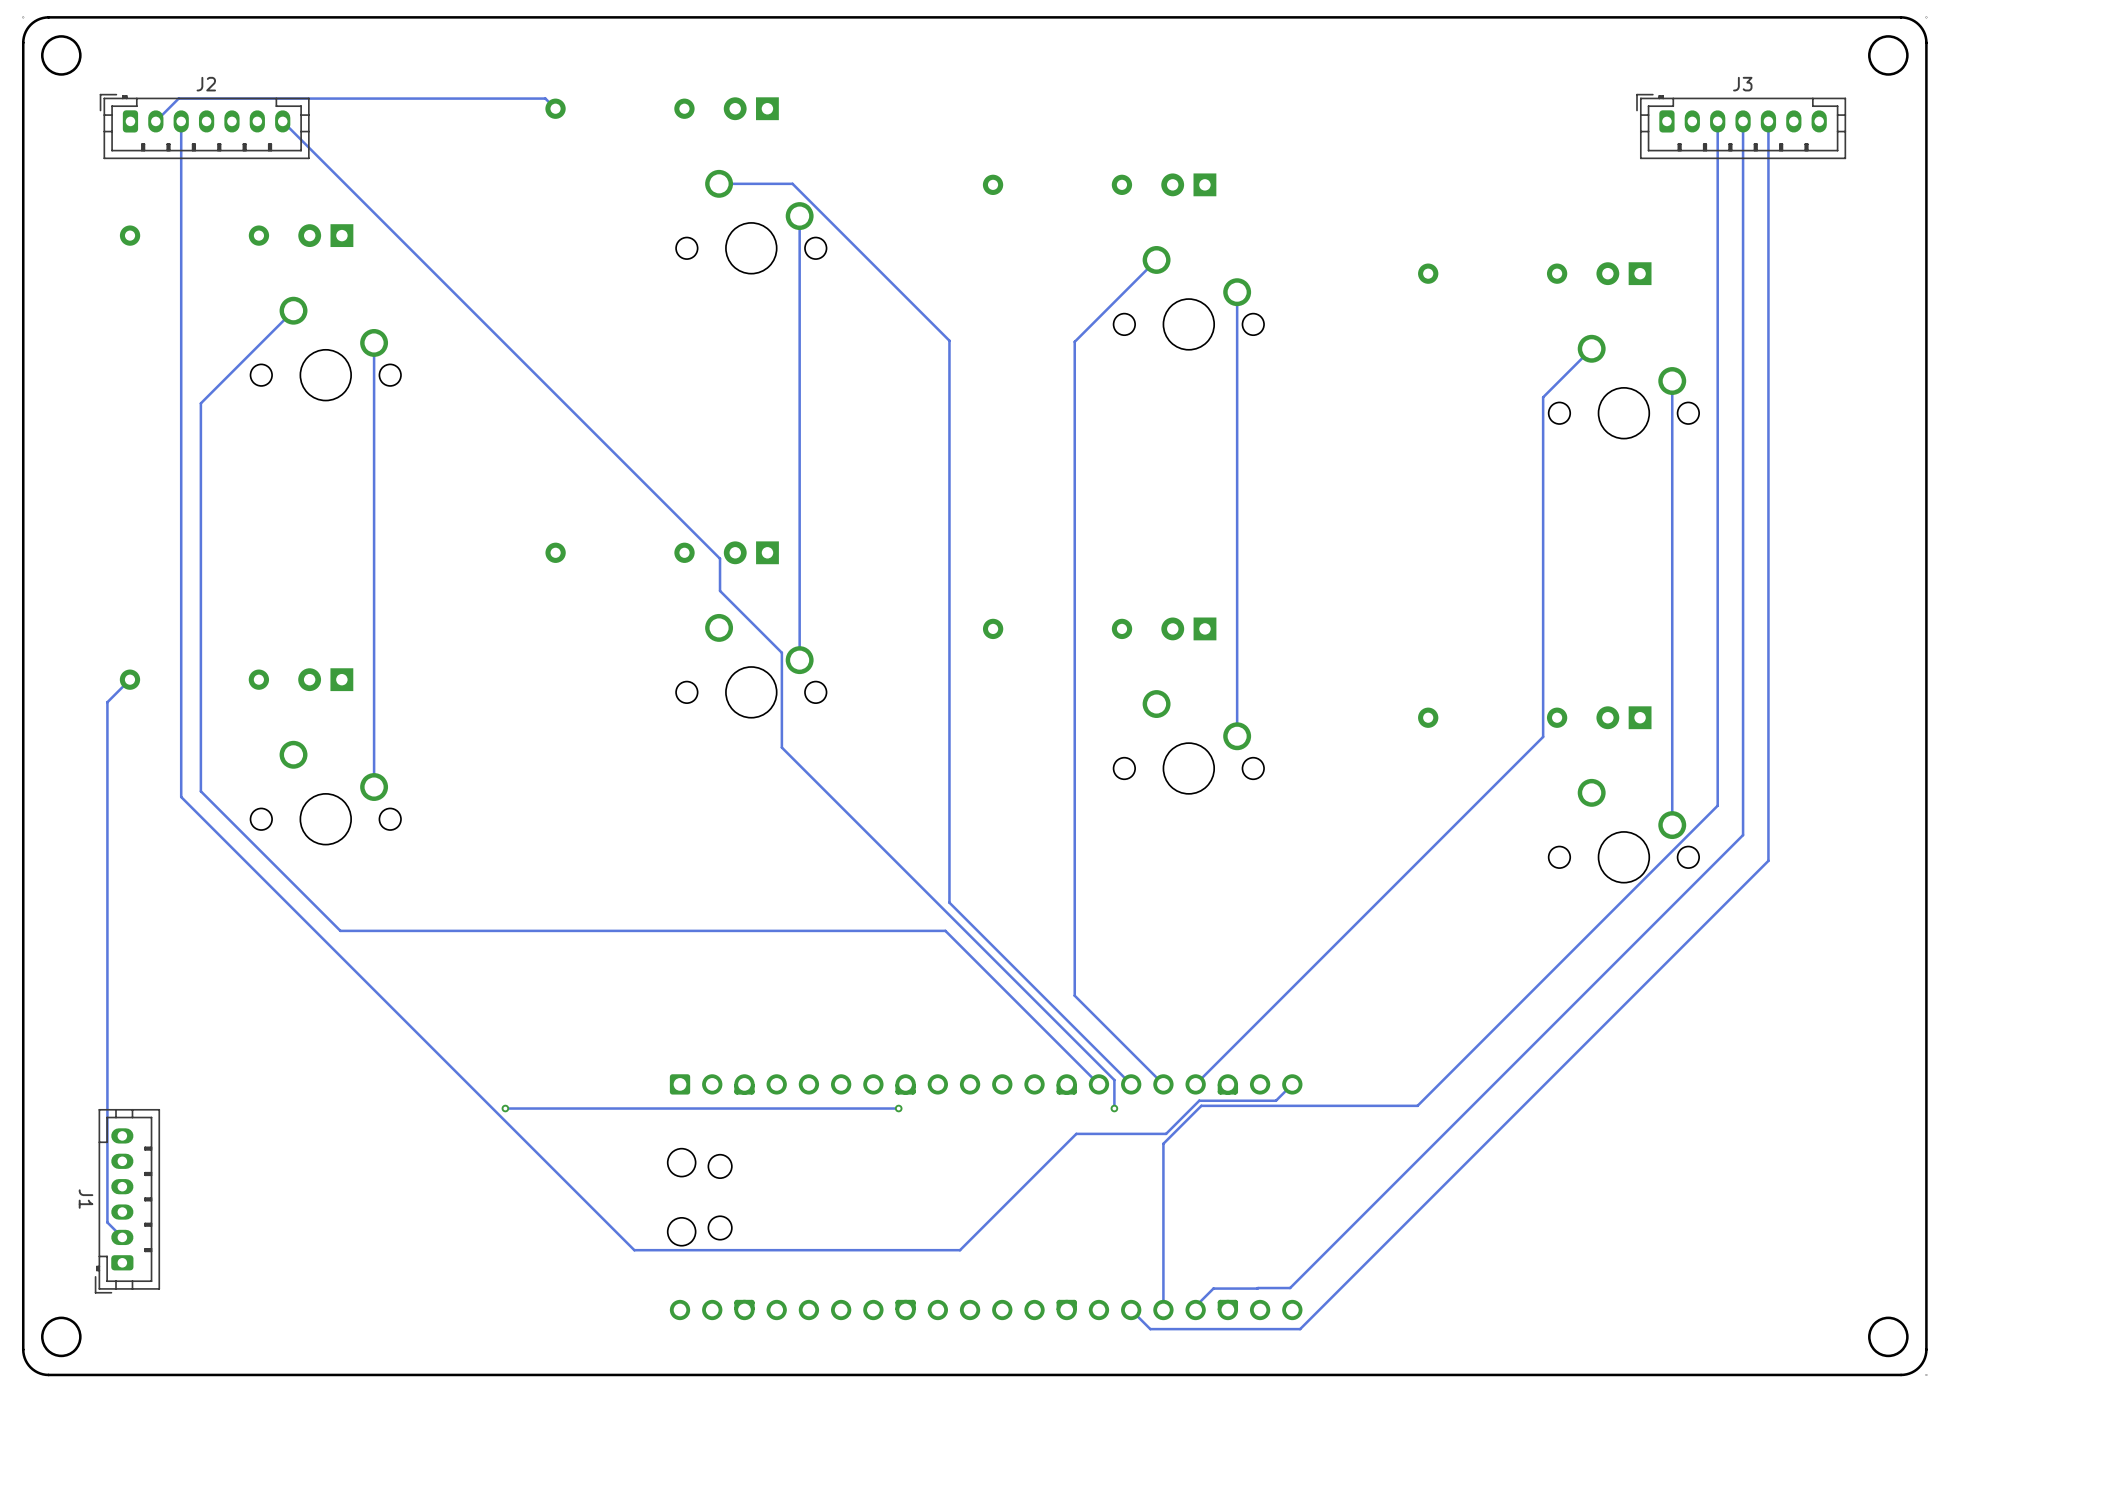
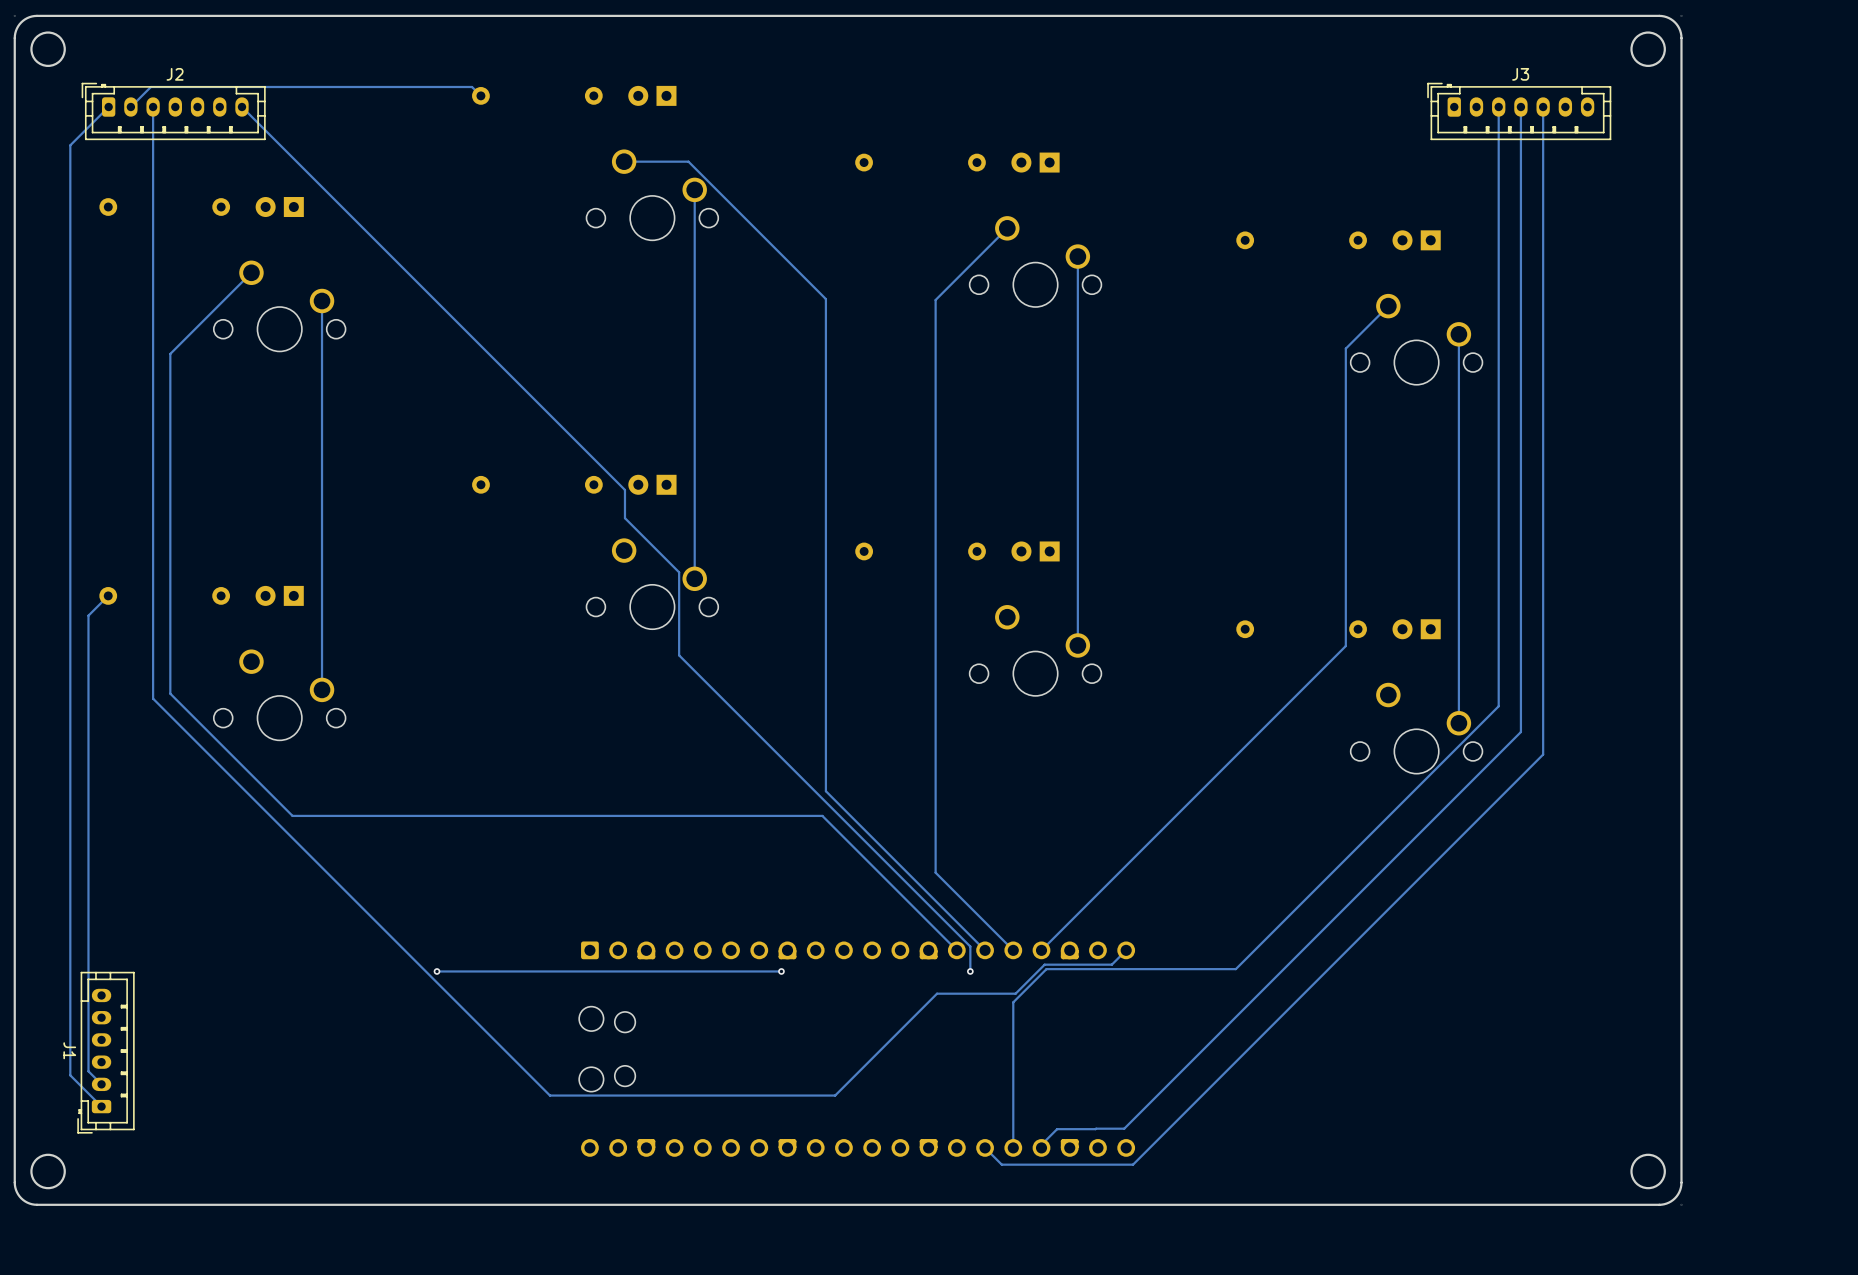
track: none -> (108, 107) (70, 145) (70, 1075) (101, 1106)

